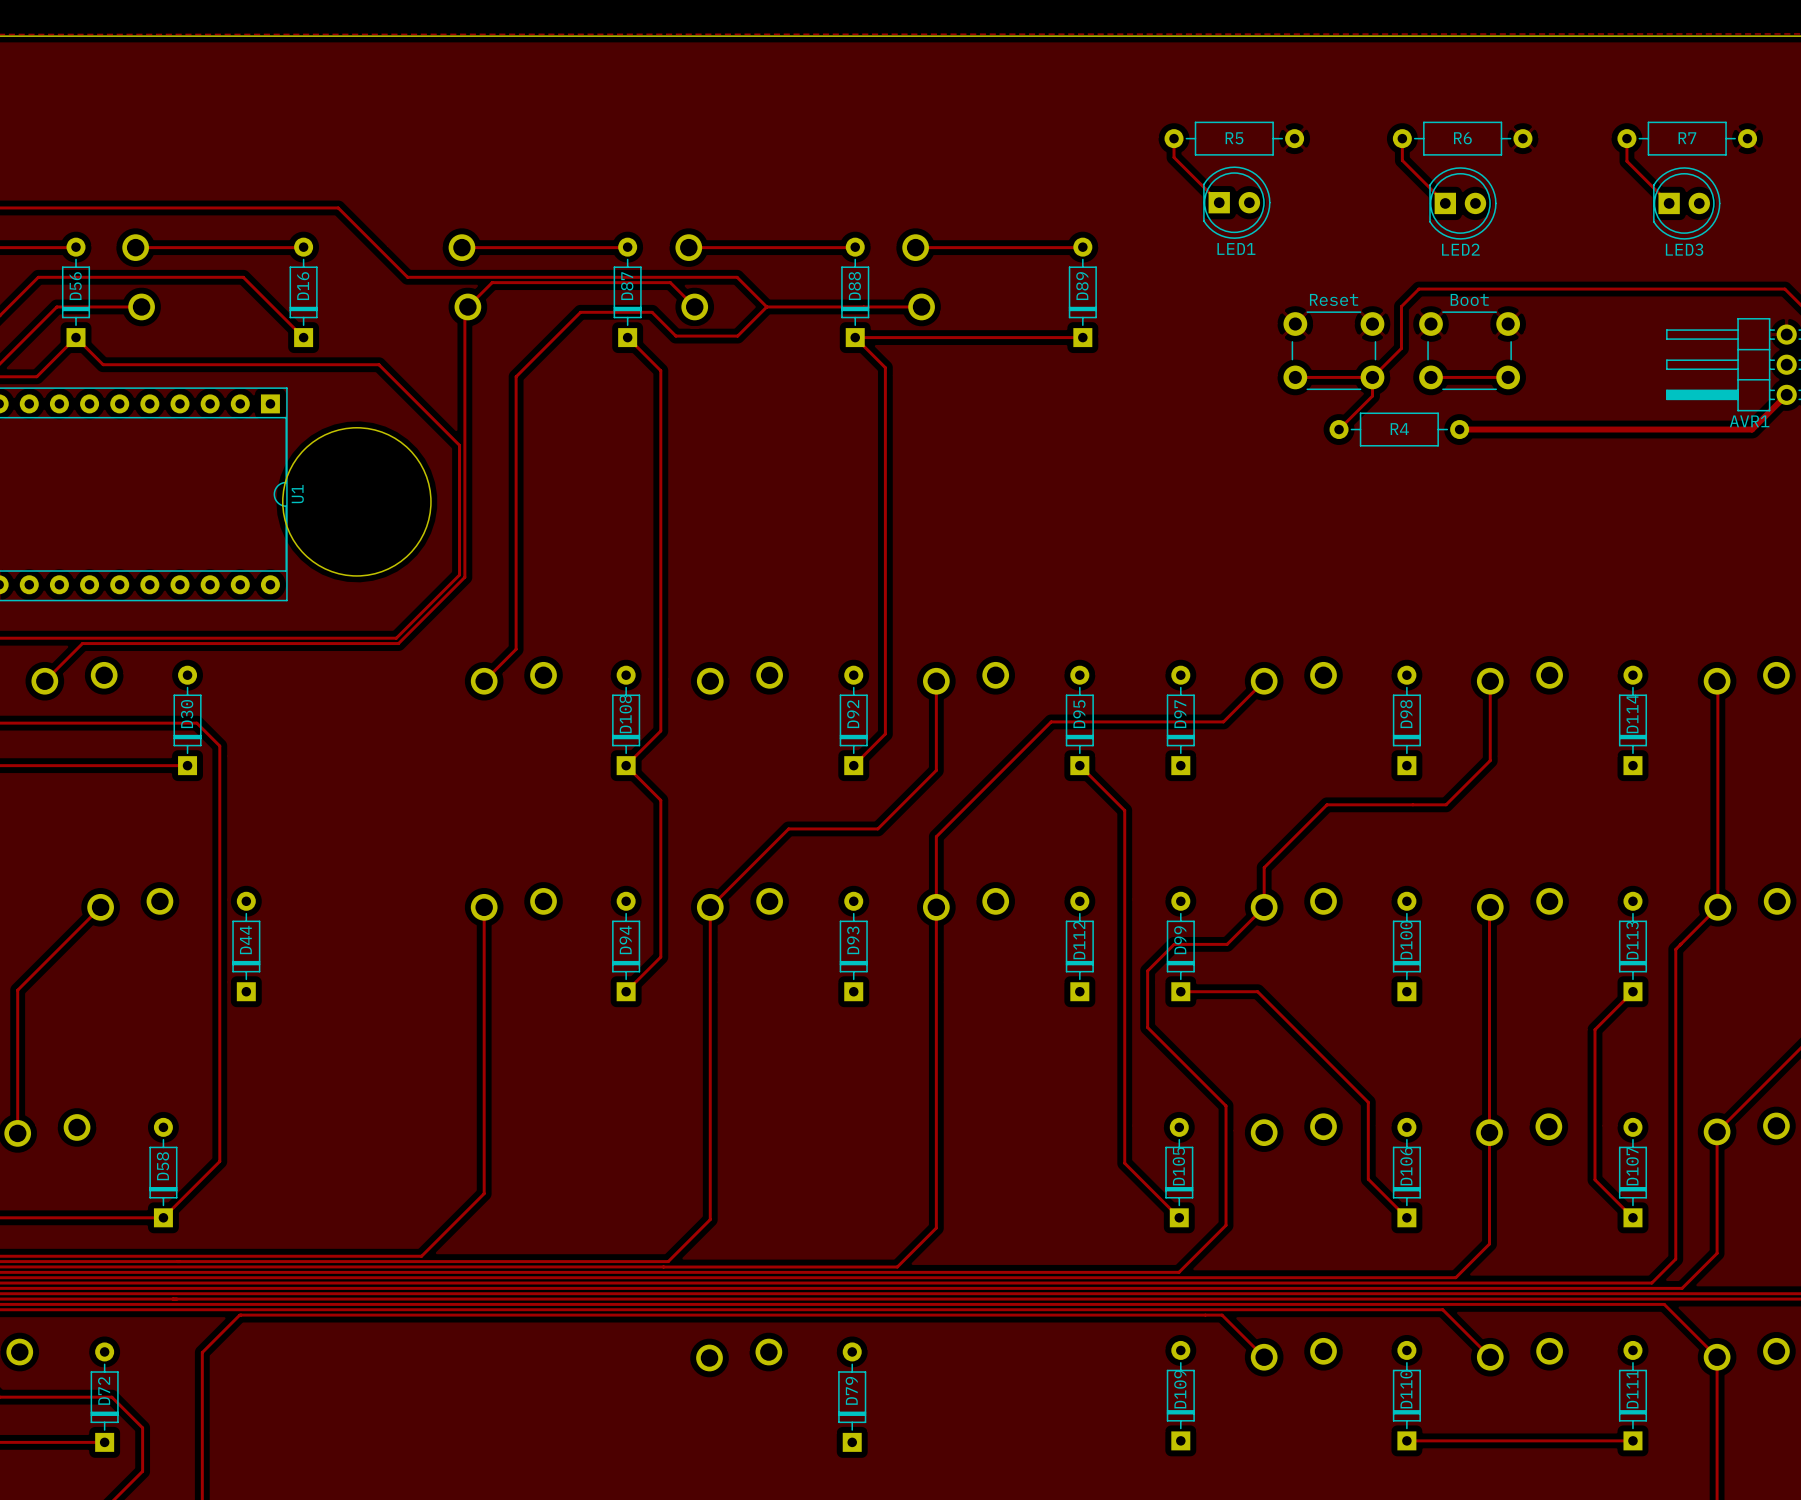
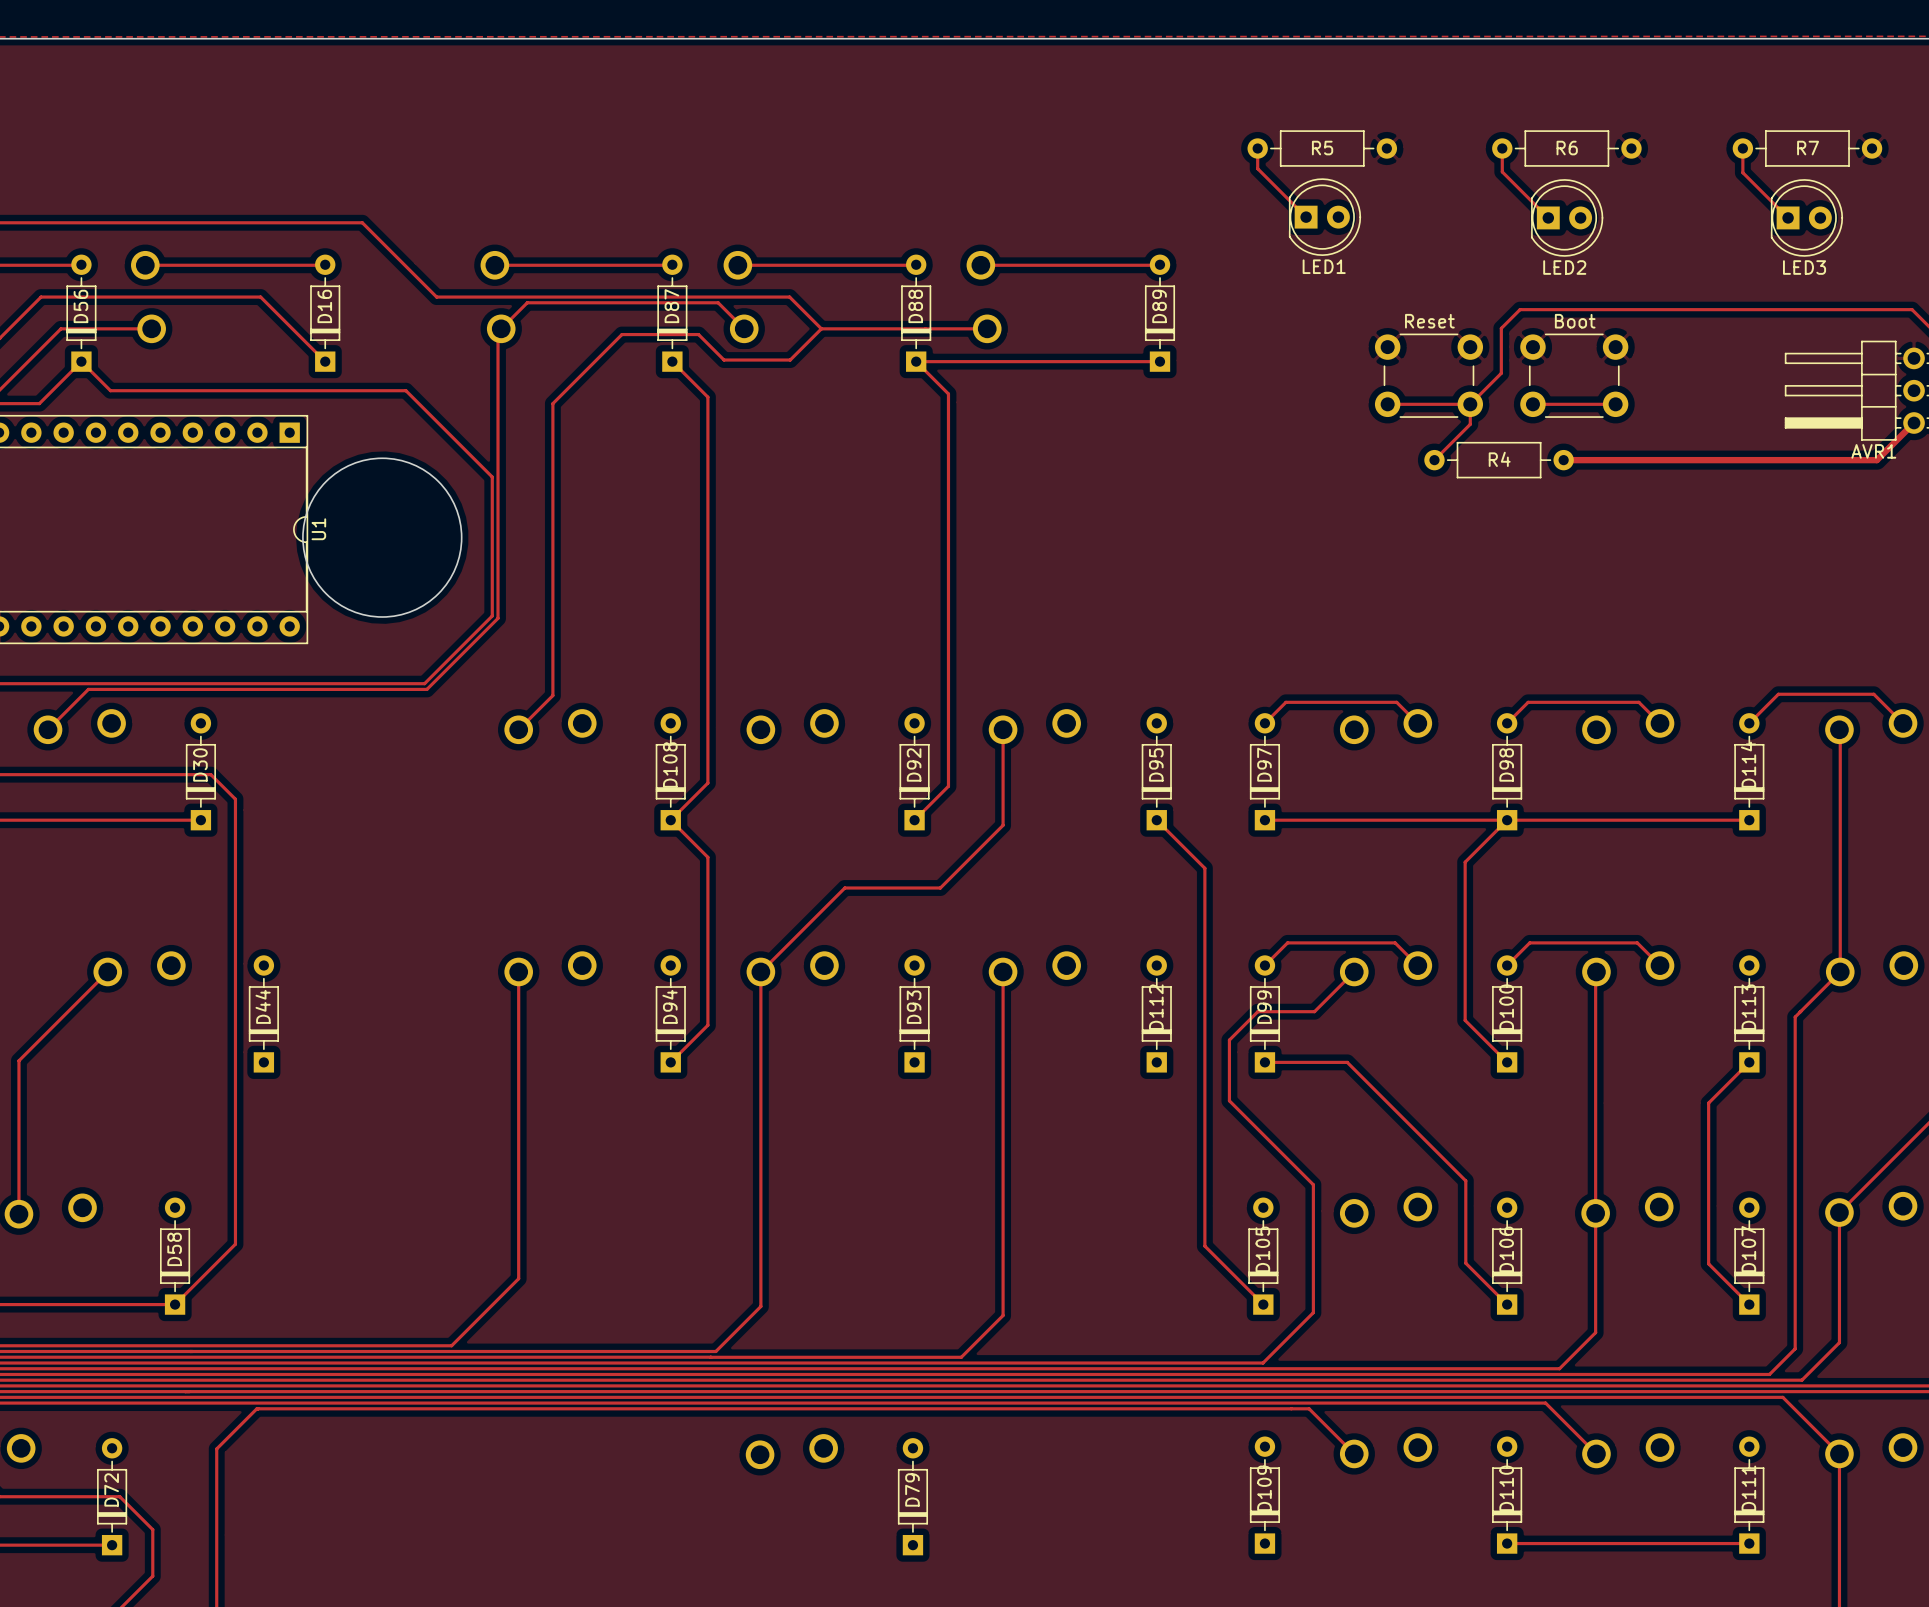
track: none -> (1264, 723) (1285, 702) (1396, 702) (1417, 723)
track: none -> (1507, 723) (1528, 702) (1638, 702) (1660, 723)
track: none -> (1749, 723) (1778, 694) (1873, 694) (1903, 723)
track: (1264, 681) (1223, 721) (1051, 721) (936, 836) (936, 907) -> none
track: (1490, 681) (1490, 760) (1446, 804) (1327, 804) (1264, 867) (1264, 907) -> none
track: none -> (1264, 820) (1749, 820)
track: none -> (1507, 820) (1465, 862) (1465, 1020) (1507, 1062)
track: none -> (1264, 965) (1287, 942) (1395, 942) (1417, 965)
track: none -> (1507, 965) (1529, 942) (1637, 942) (1660, 965)

